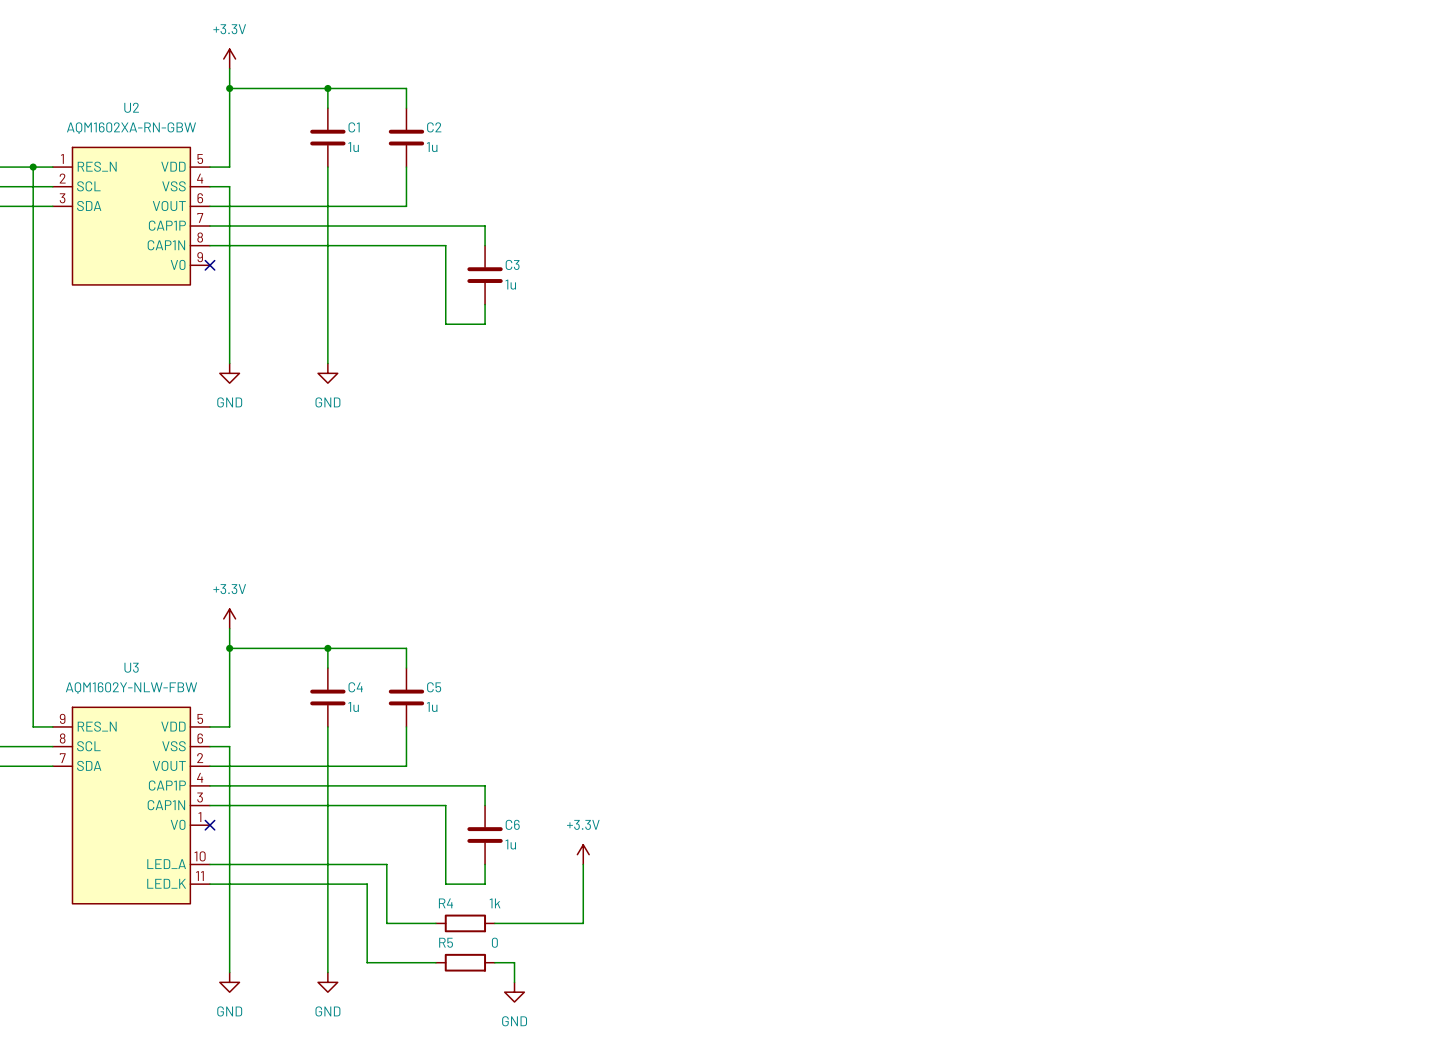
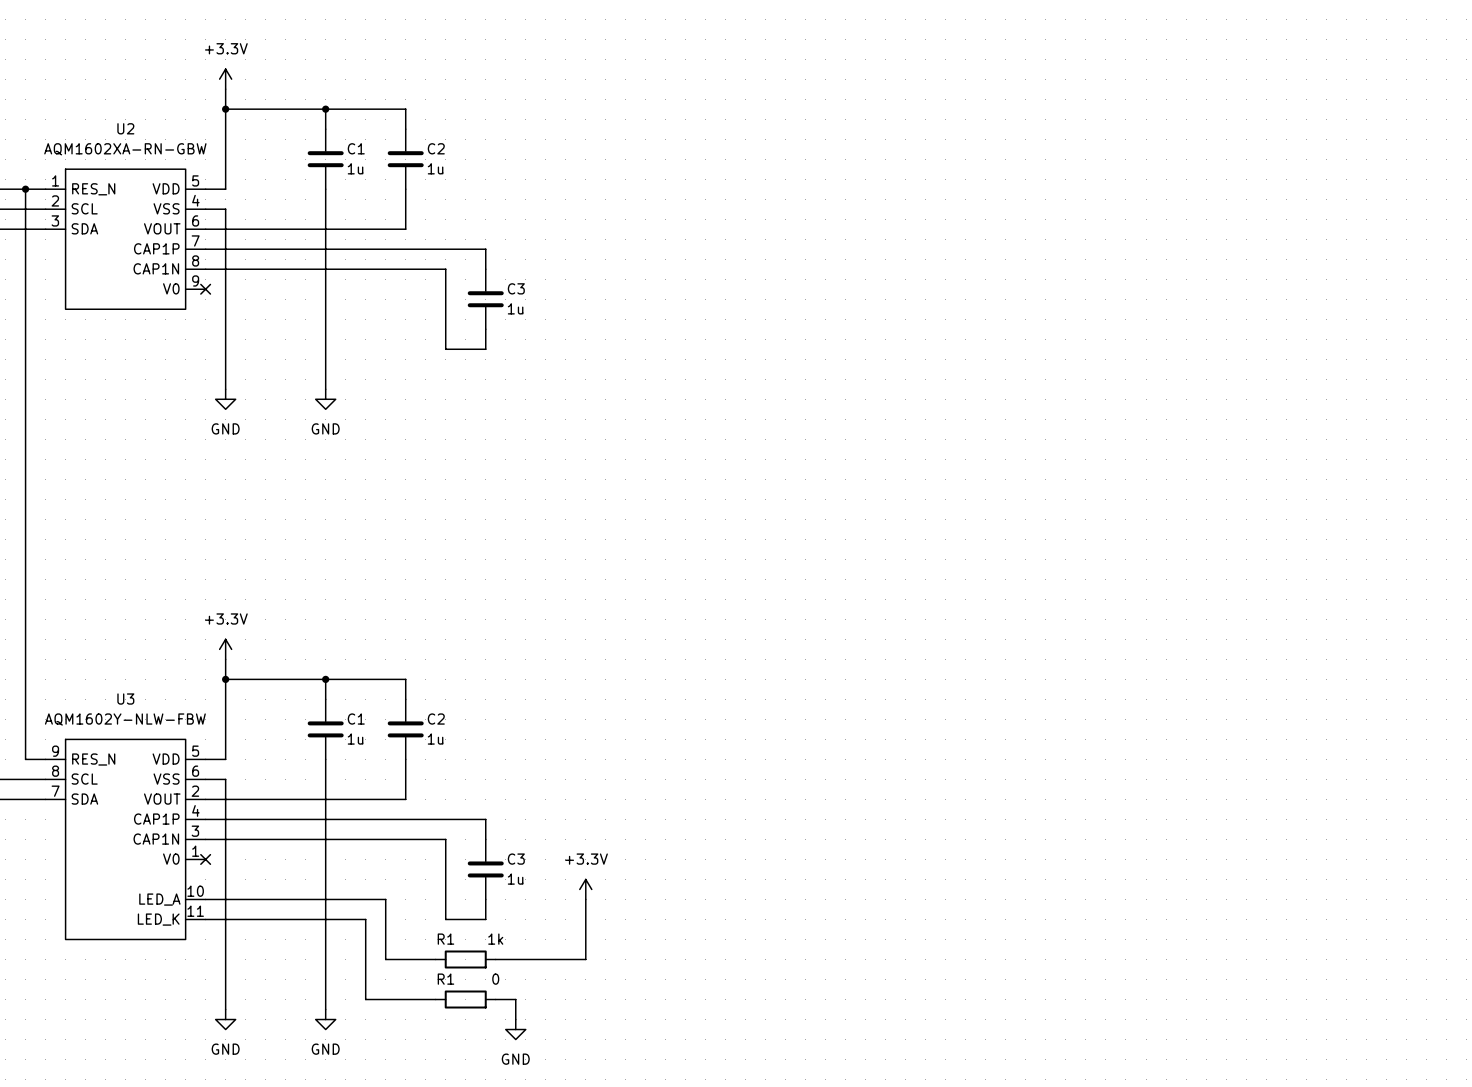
C4 name: C4 (355, 687) -> C1 (356, 719)
C5 name: C5 (434, 687) -> C2 (436, 719)
C6 name: C6 (512, 824) -> C3 (516, 859)
R4 name: R4 (445, 903) -> R1 (445, 939)
R5 name: R5 (446, 942) -> R1 (445, 979)

